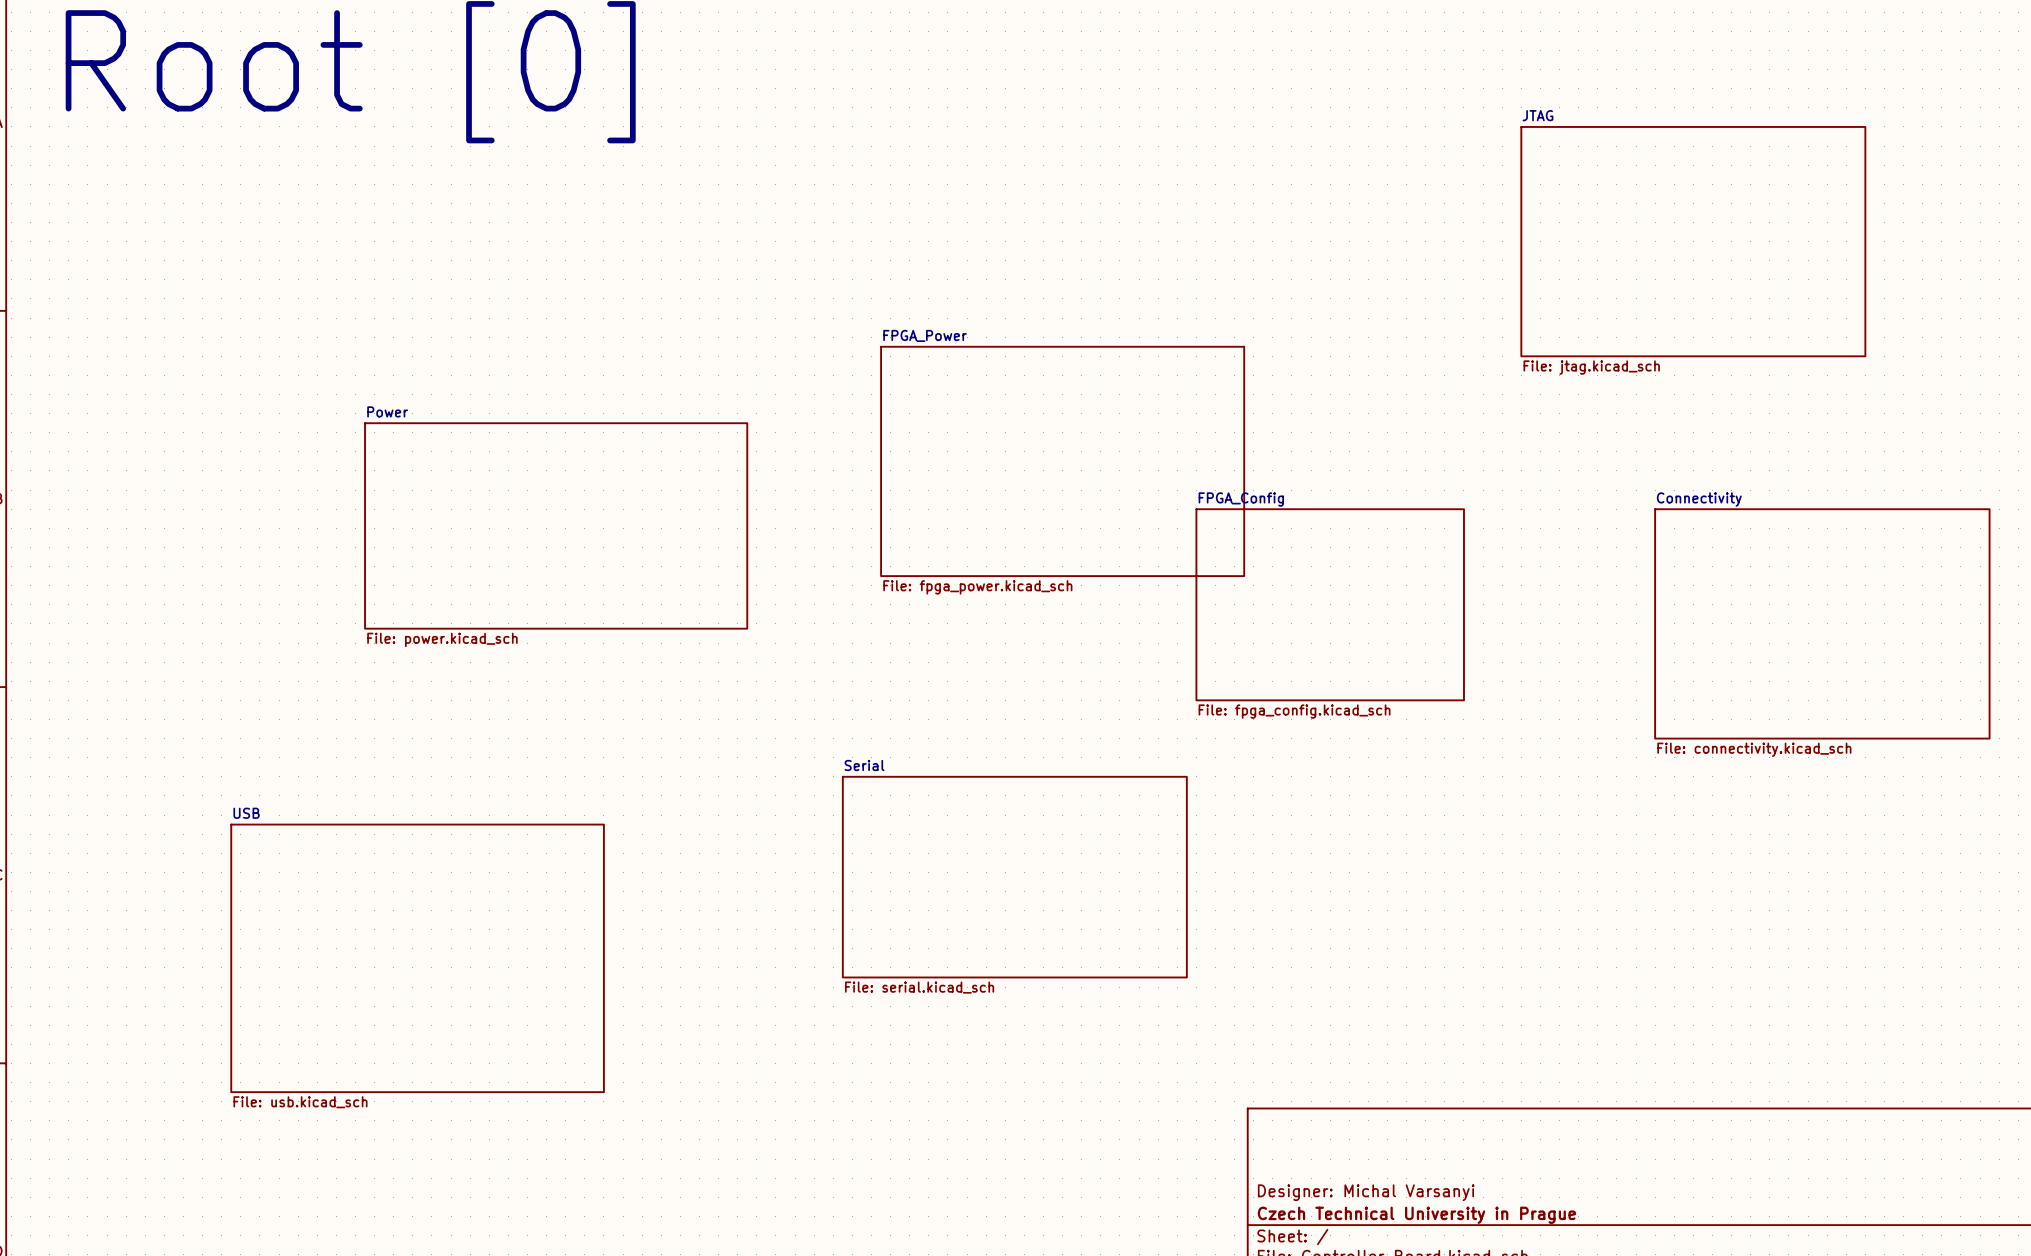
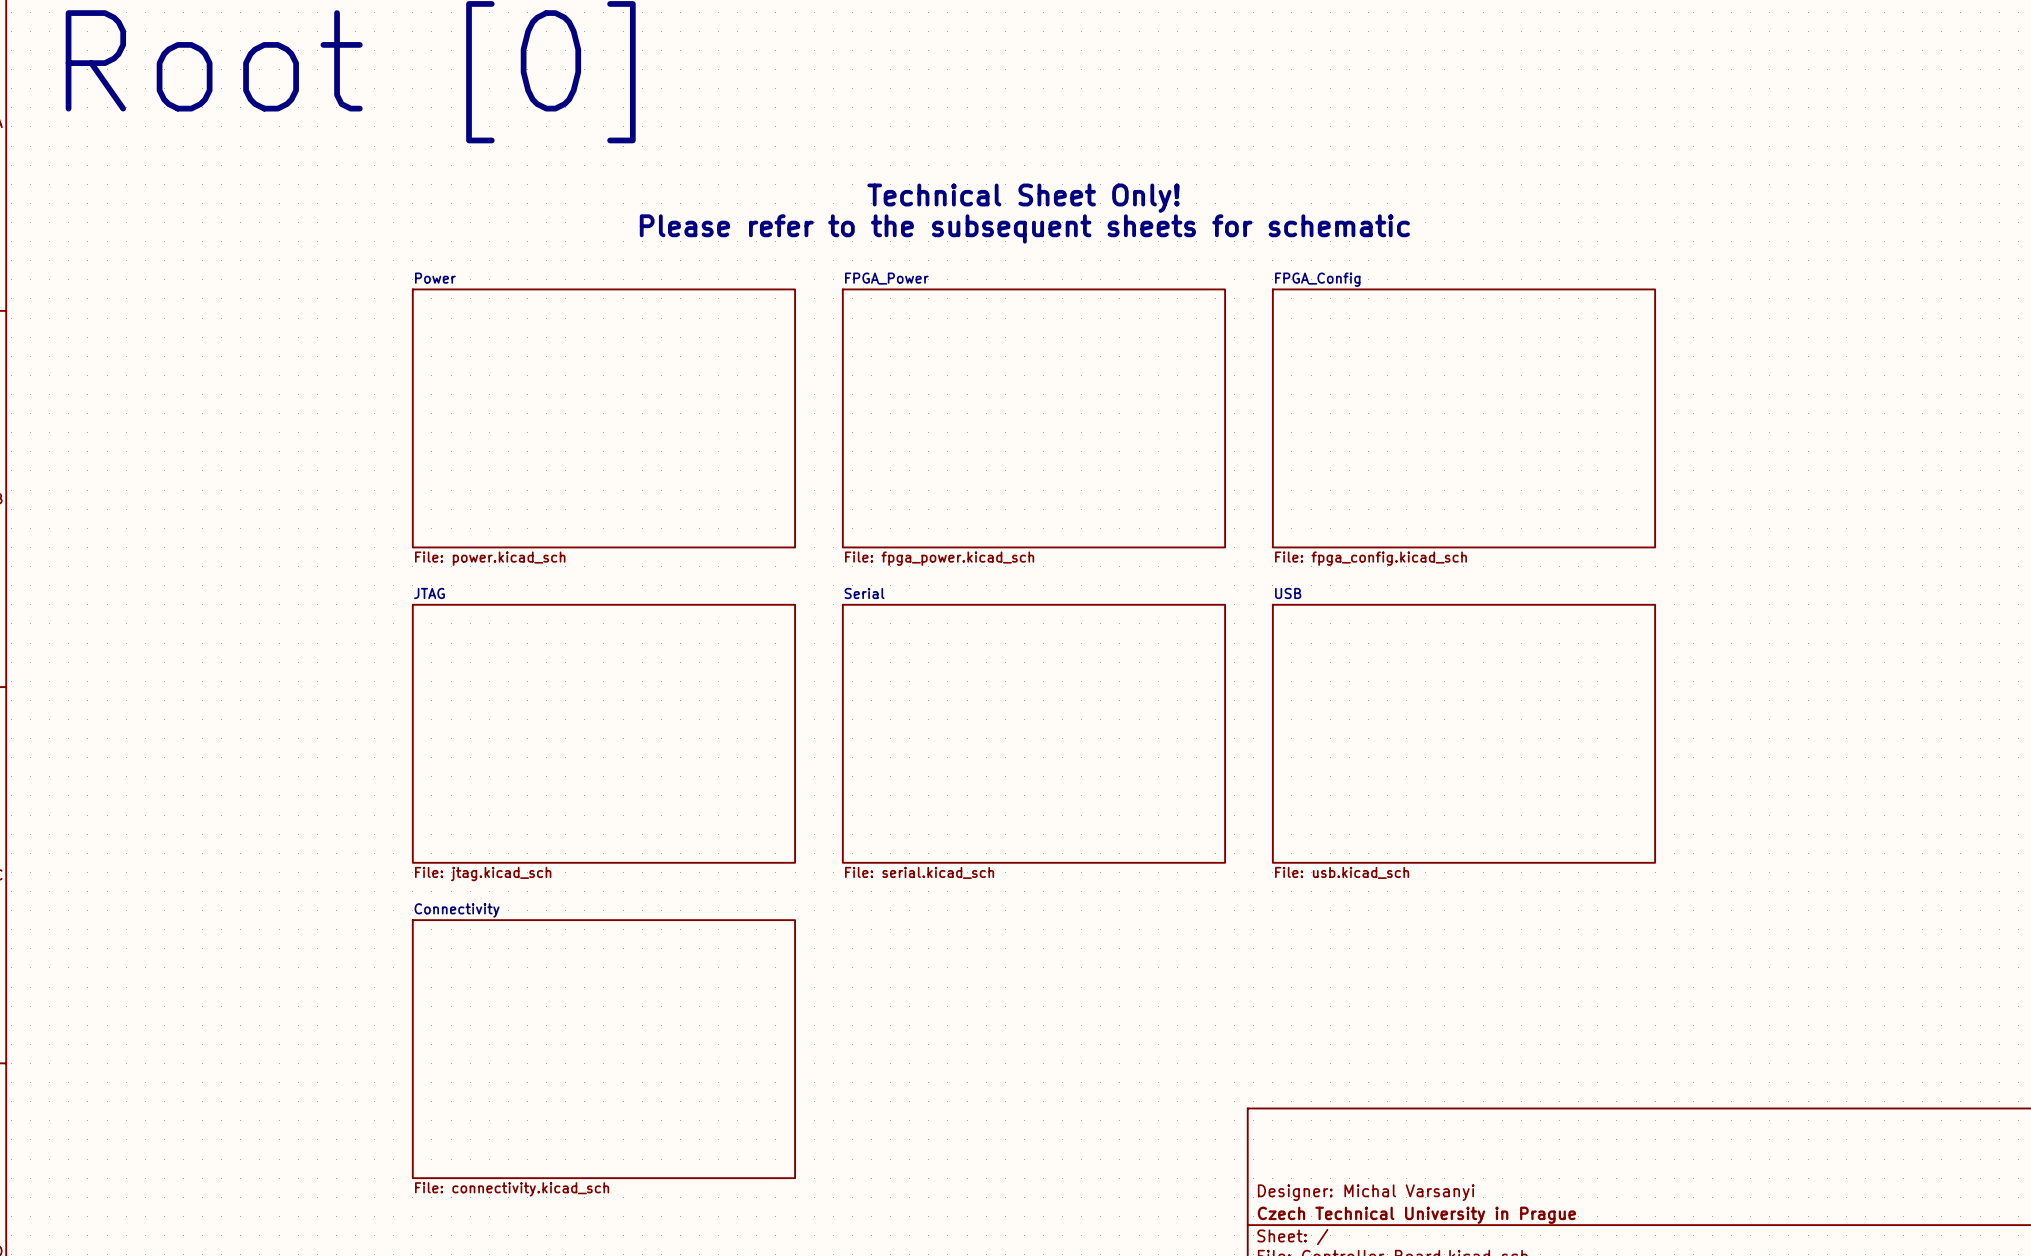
text: none -> Technical Sheet Only! (1023, 198)
text: none -> Please refer to the subsequent sheets for schematic (1024, 228)
sheet JTAG: File: jtag.kicad_sch (1693, 241) -> none
sheet Power: none -> File: power.kicad_sch (603, 418)
sheet FPGA_Power: none -> File: fpga_power.kicad_sch (1033, 418)
sheet FPGA_Config: none -> File: fpga_config.kicad_sch (1463, 418)
sheet FPGA_Power: File: fpga_power.kicad_sch (1062, 461) -> none
sheet Power: File: power.kicad_sch (556, 525) -> none
sheet FPGA_Config: File: fpga_config.kicad_sch (1330, 604) -> none
sheet Connectivity: File: connectivity.kicad_sch (1822, 623) -> none
sheet JTAG: none -> File: jtag.kicad_sch (603, 733)
sheet Serial: none -> File: serial.kicad_sch (1033, 733)
sheet USB: none -> File: usb.kicad_sch (1463, 733)
sheet Serial: File: serial.kicad_sch (1014, 877) -> none
sheet USB: File: usb.kicad_sch (417, 958) -> none
sheet Connectivity: none -> File: connectivity.kicad_sch (603, 1049)

